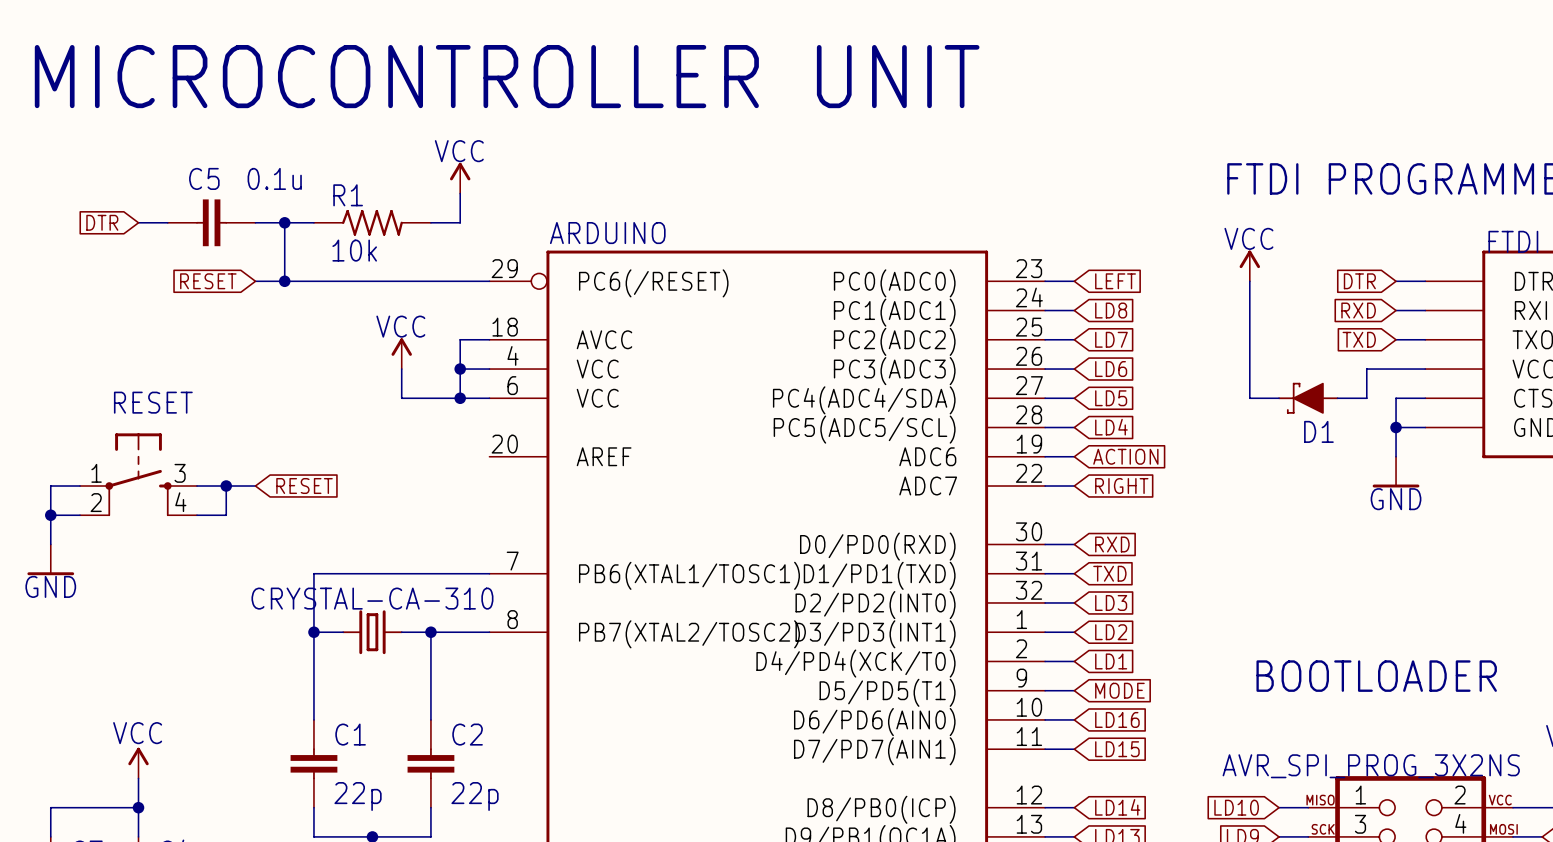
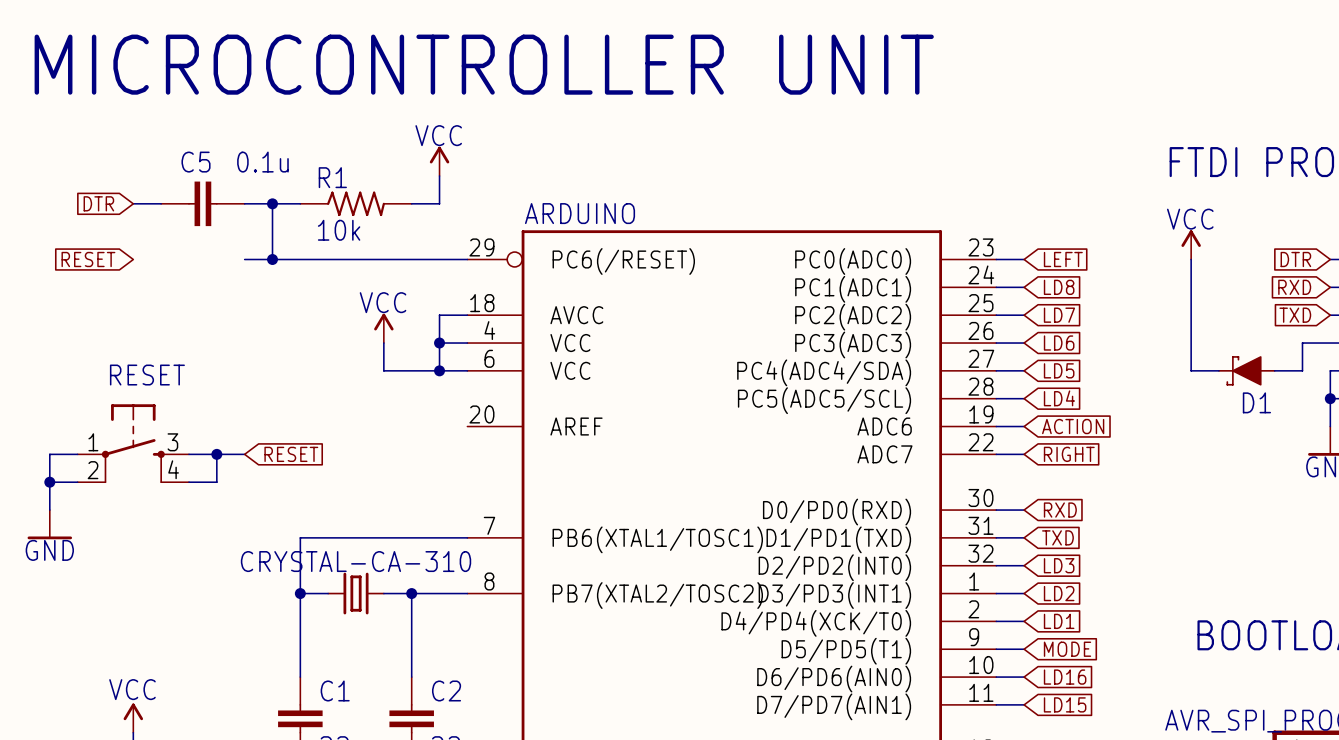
global label position: RESET (208, 281) -> RESET (88, 259)

